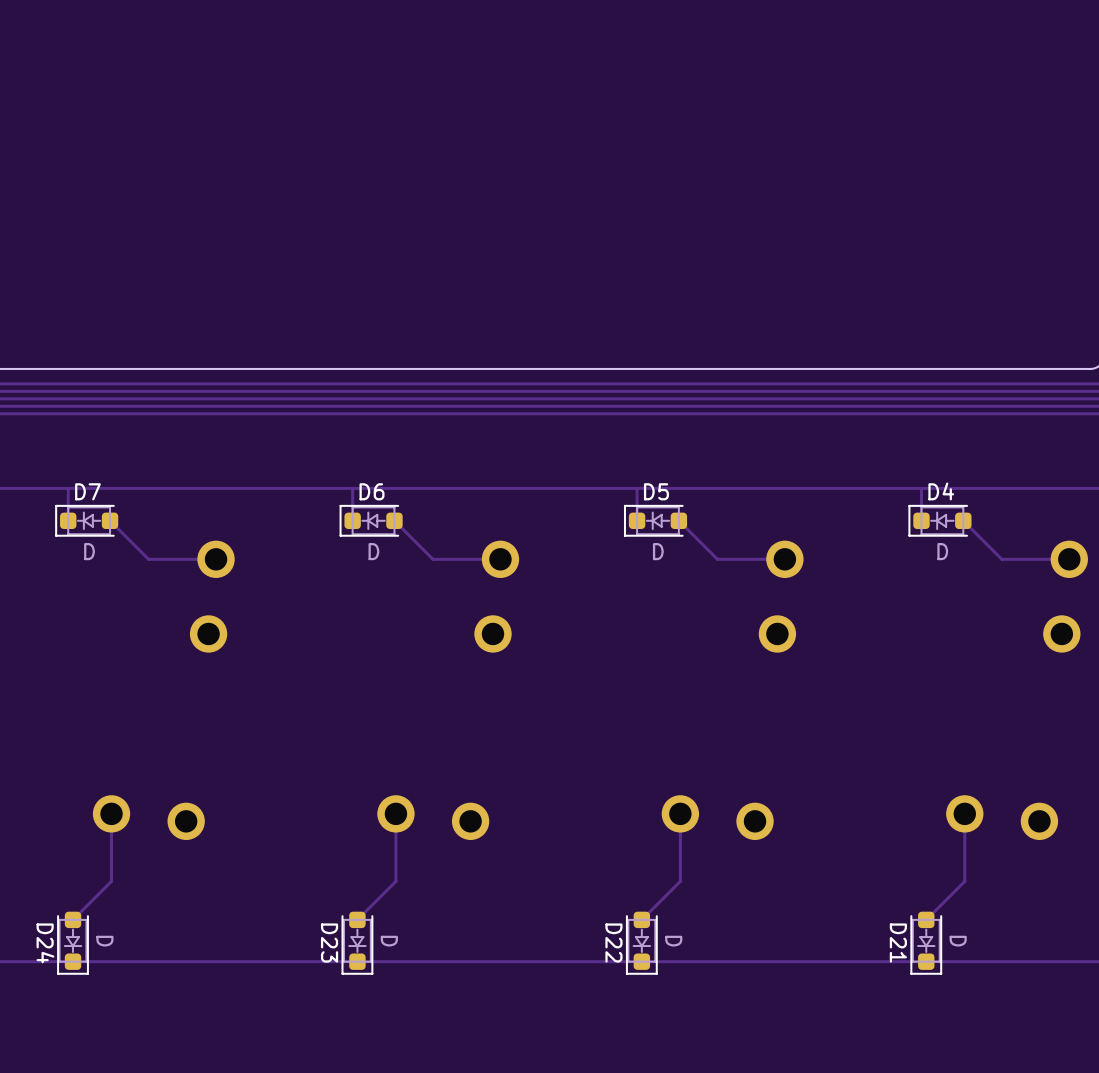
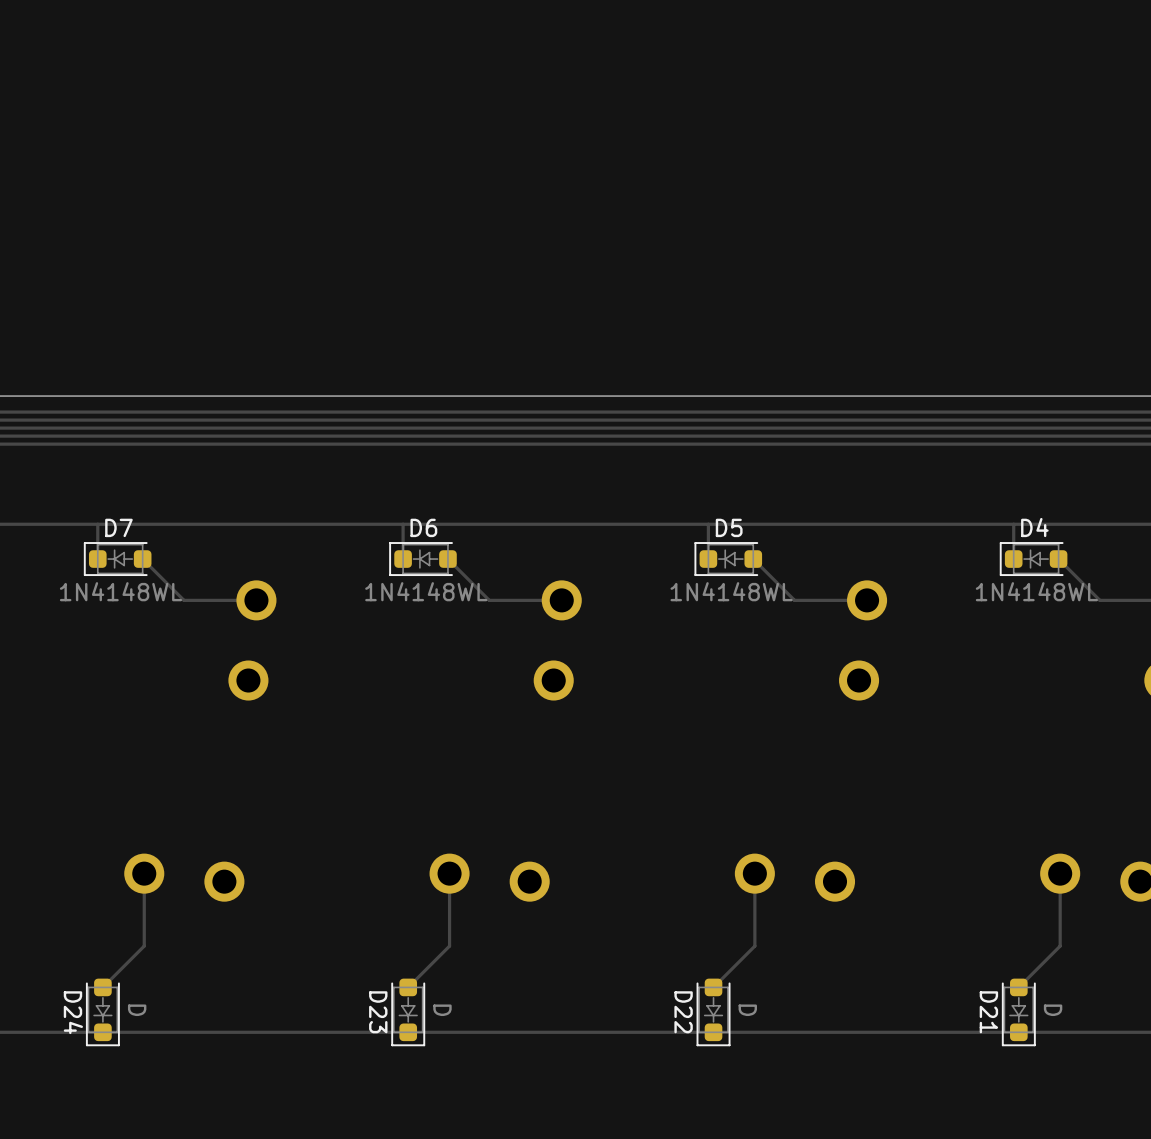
D7 value: D (89, 551) -> 1N4148WL (120, 591)
D6 value: D (373, 551) -> 1N4148WL (426, 591)
D5 value: D (658, 551) -> 1N4148WL (731, 591)
D4 value: D (942, 551) -> 1N4148WL (1036, 591)

